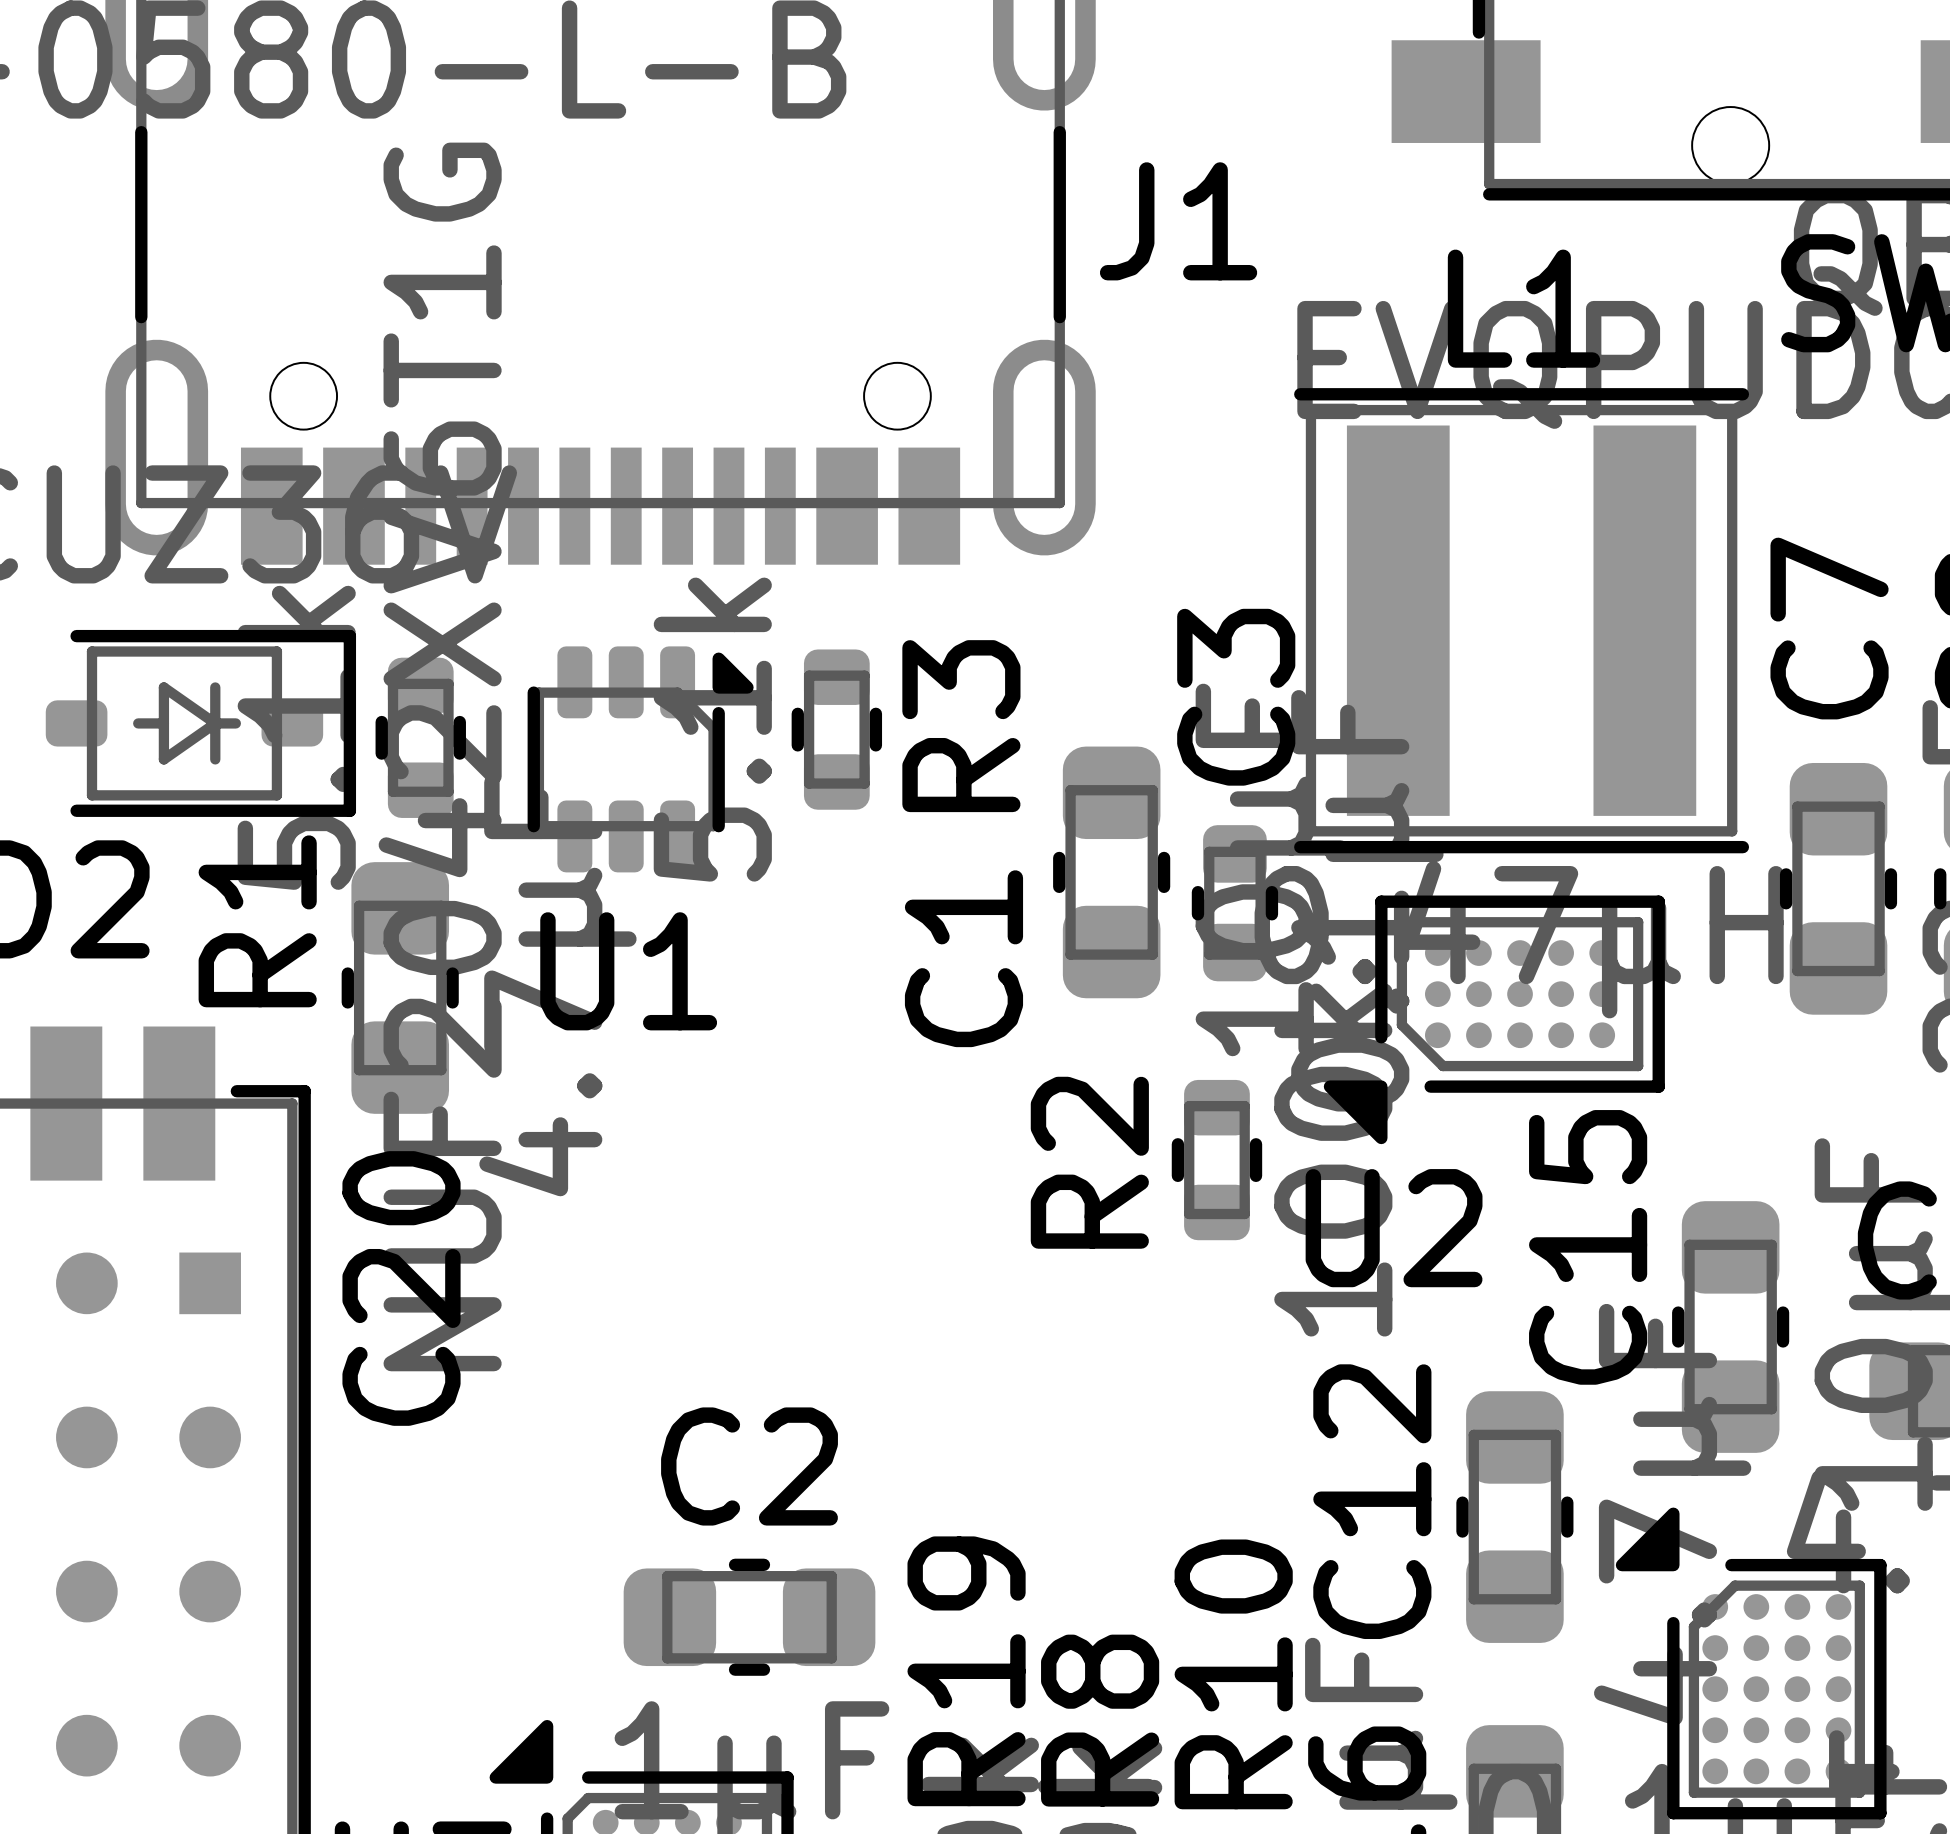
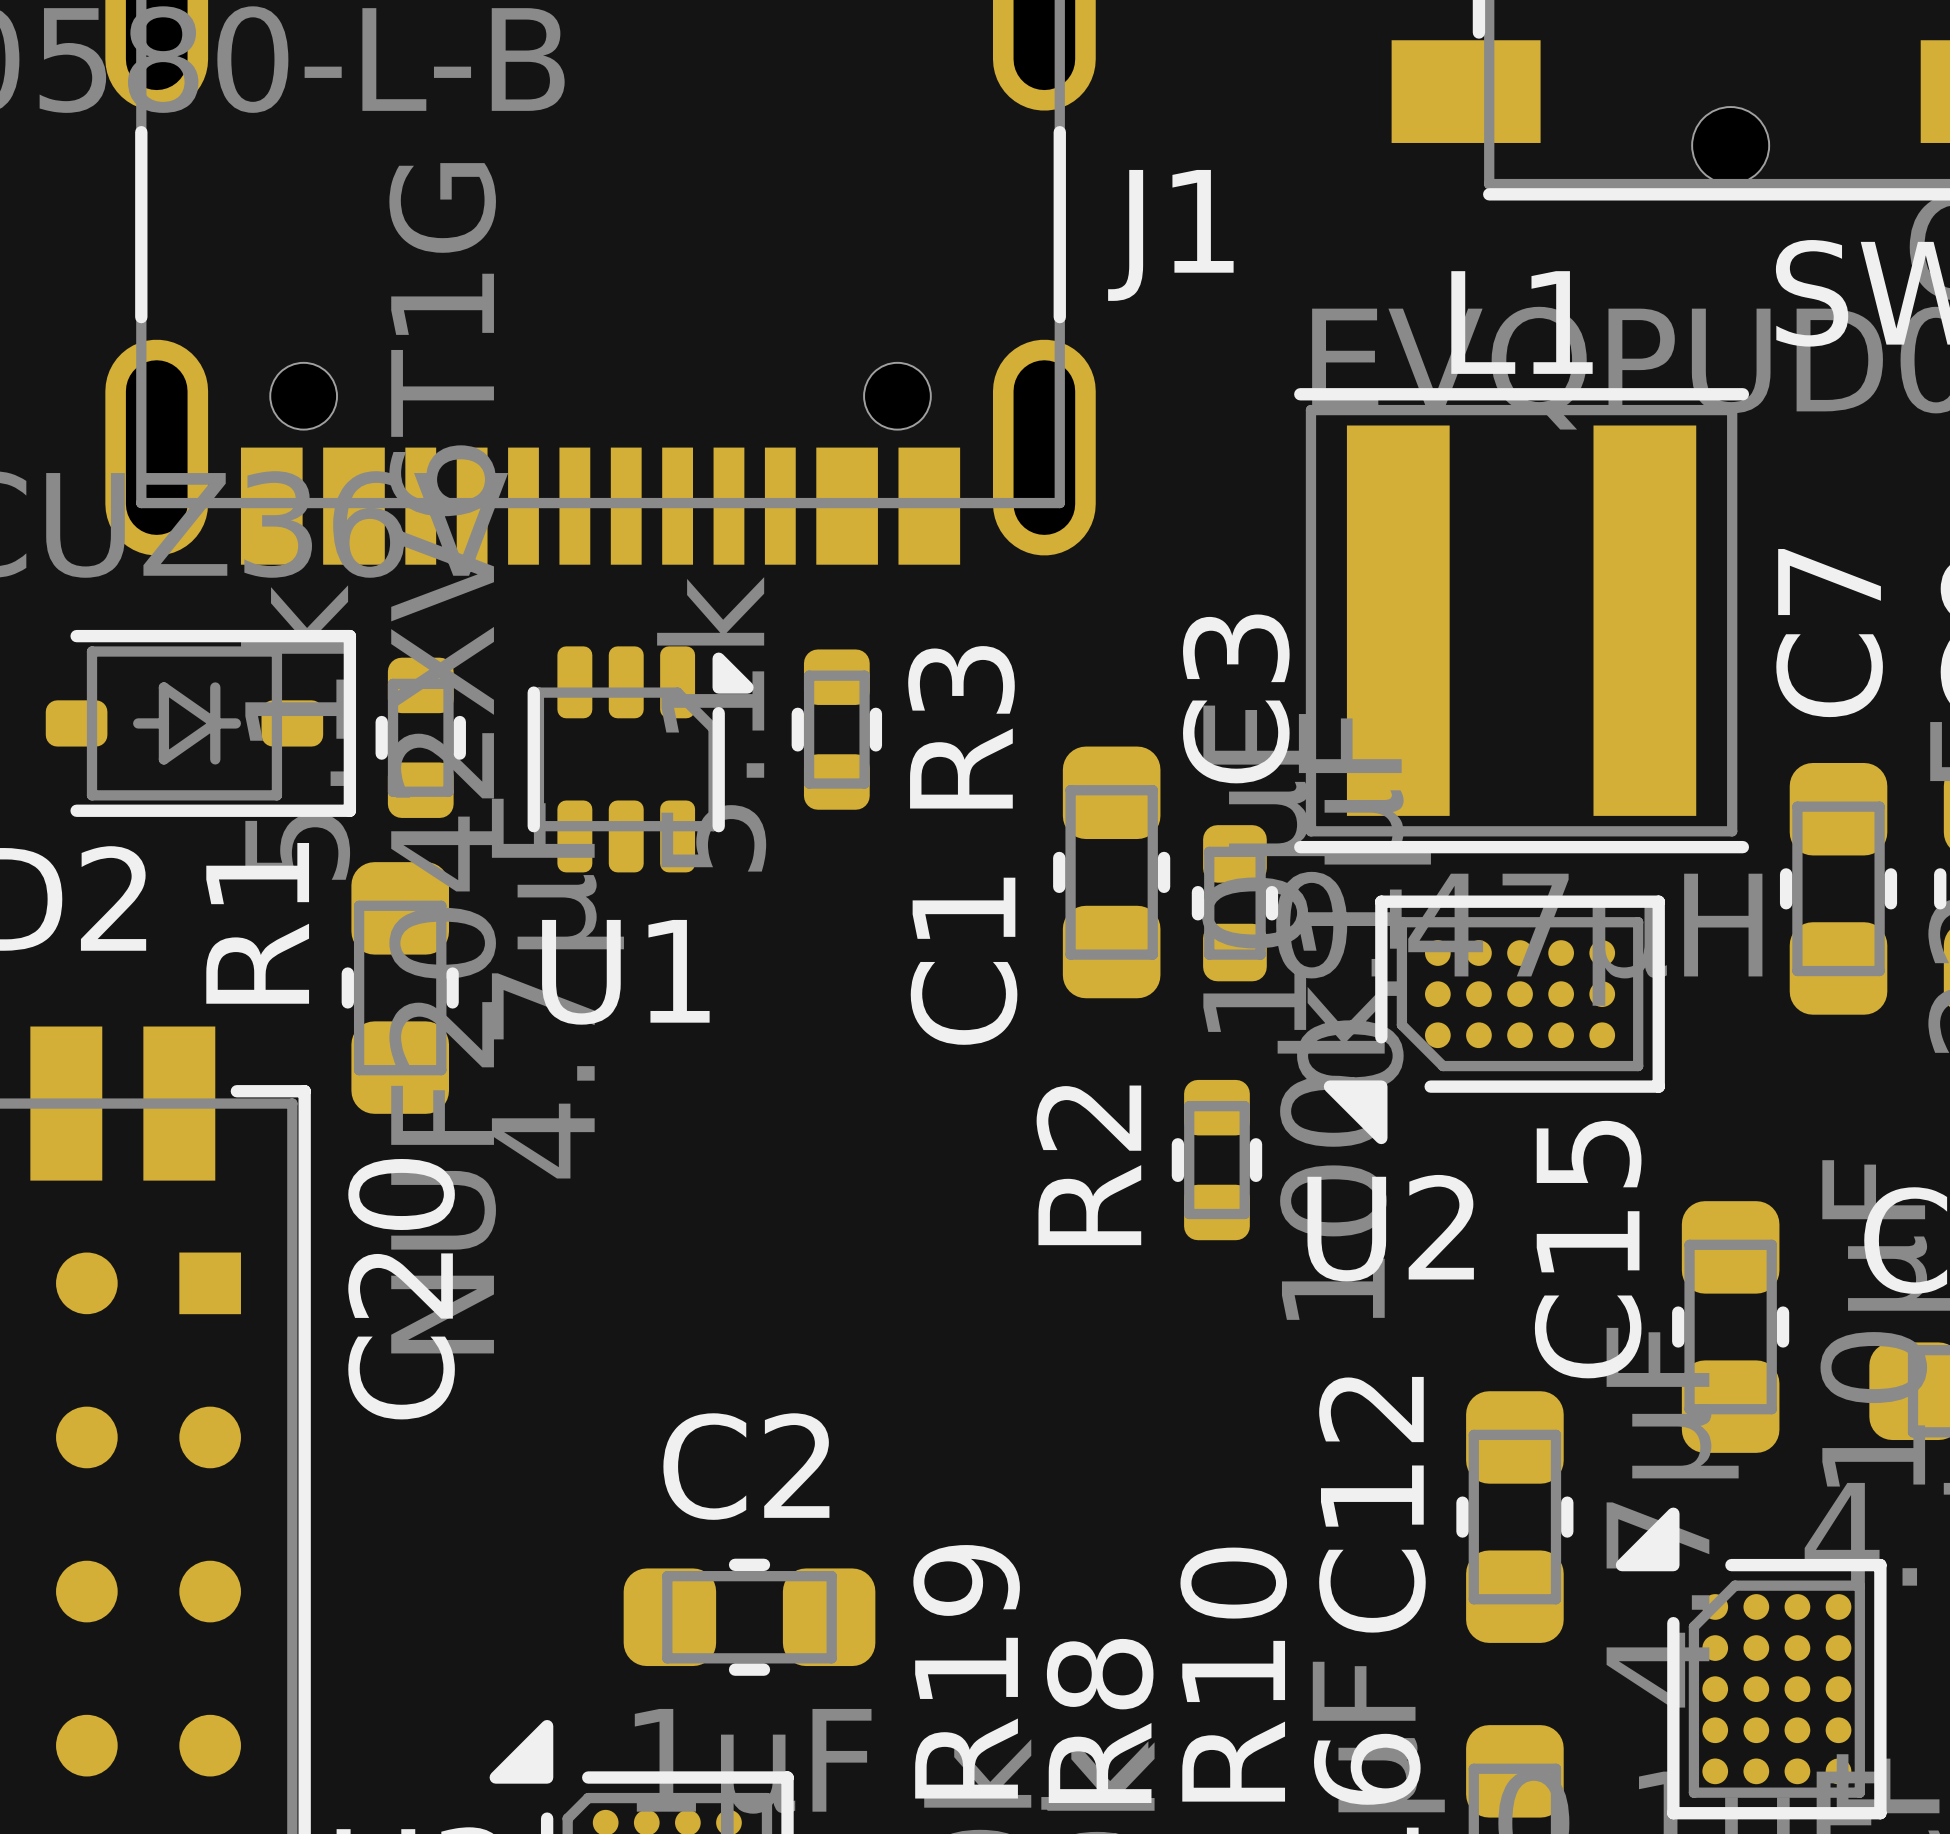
L1 name position: L1 (1524, 308) -> L1 (1521, 322)

